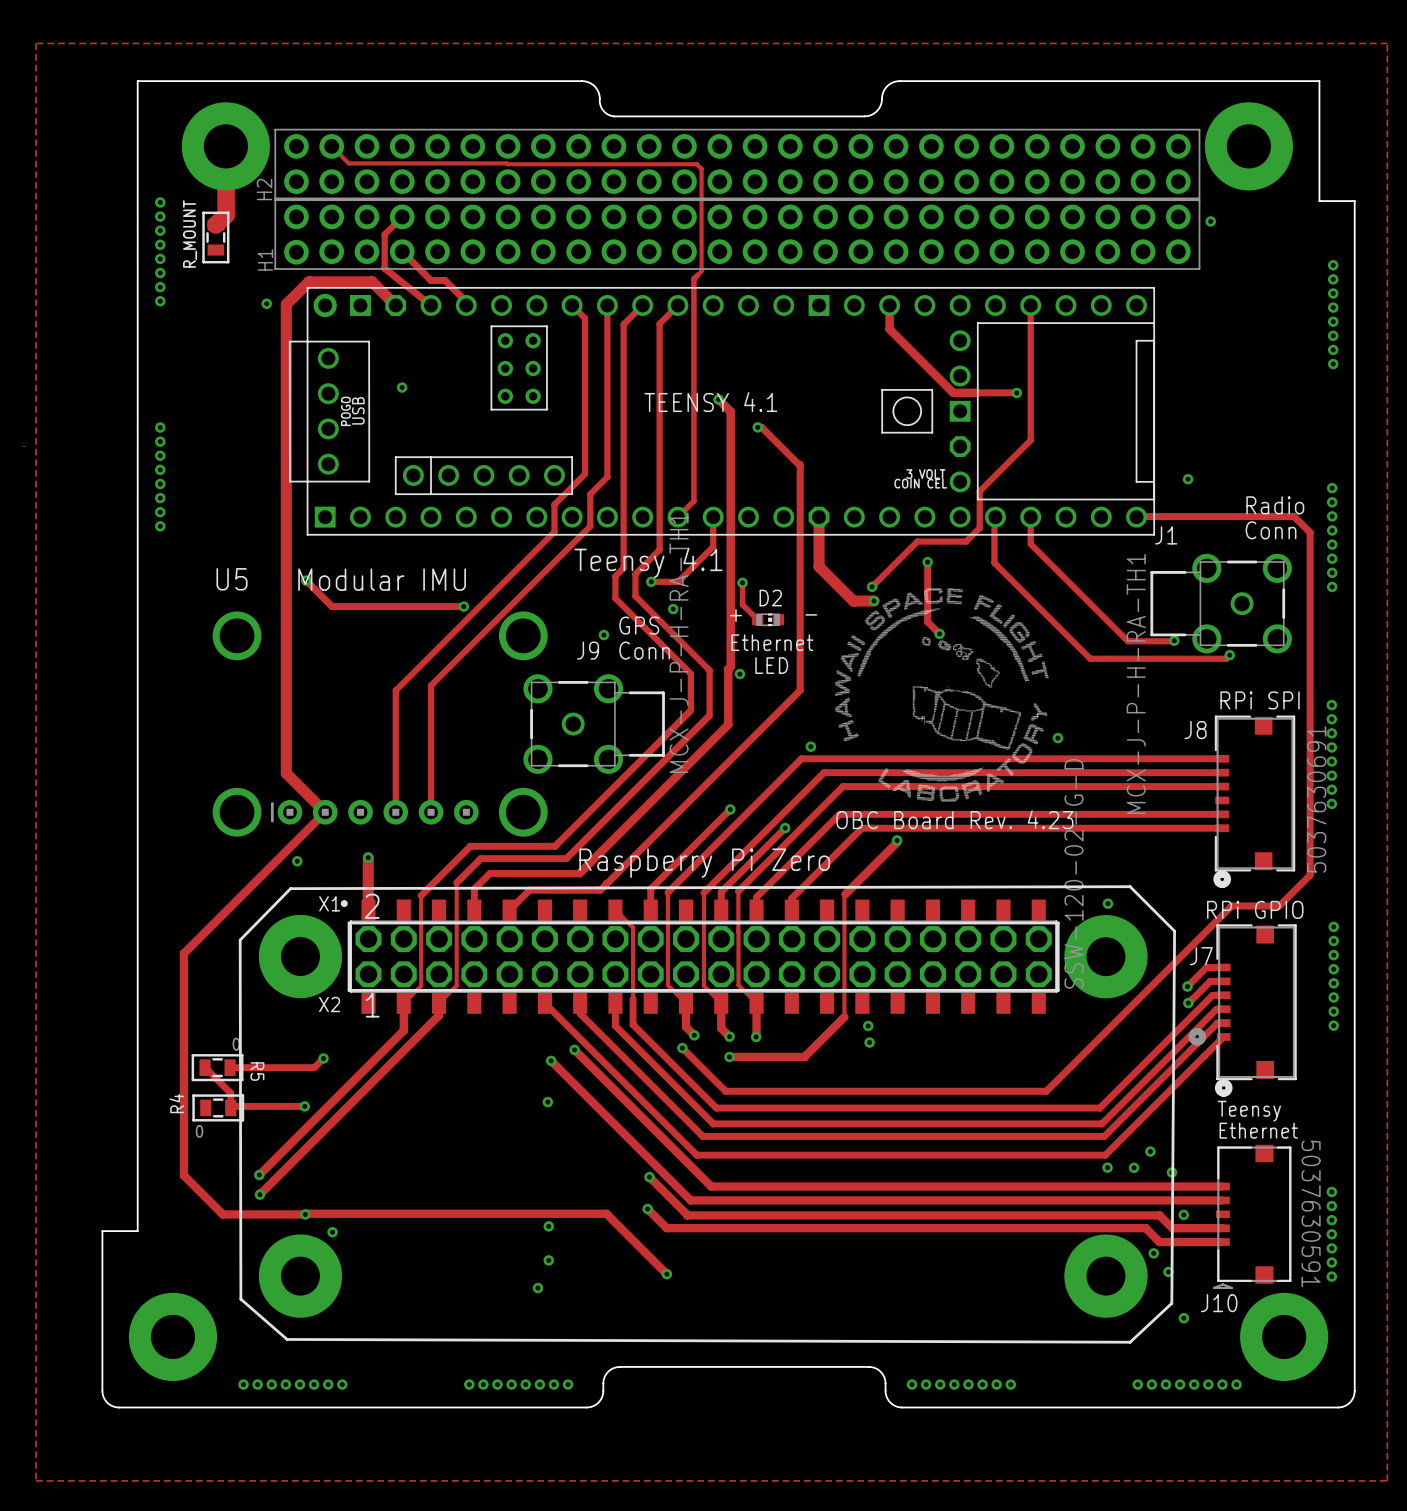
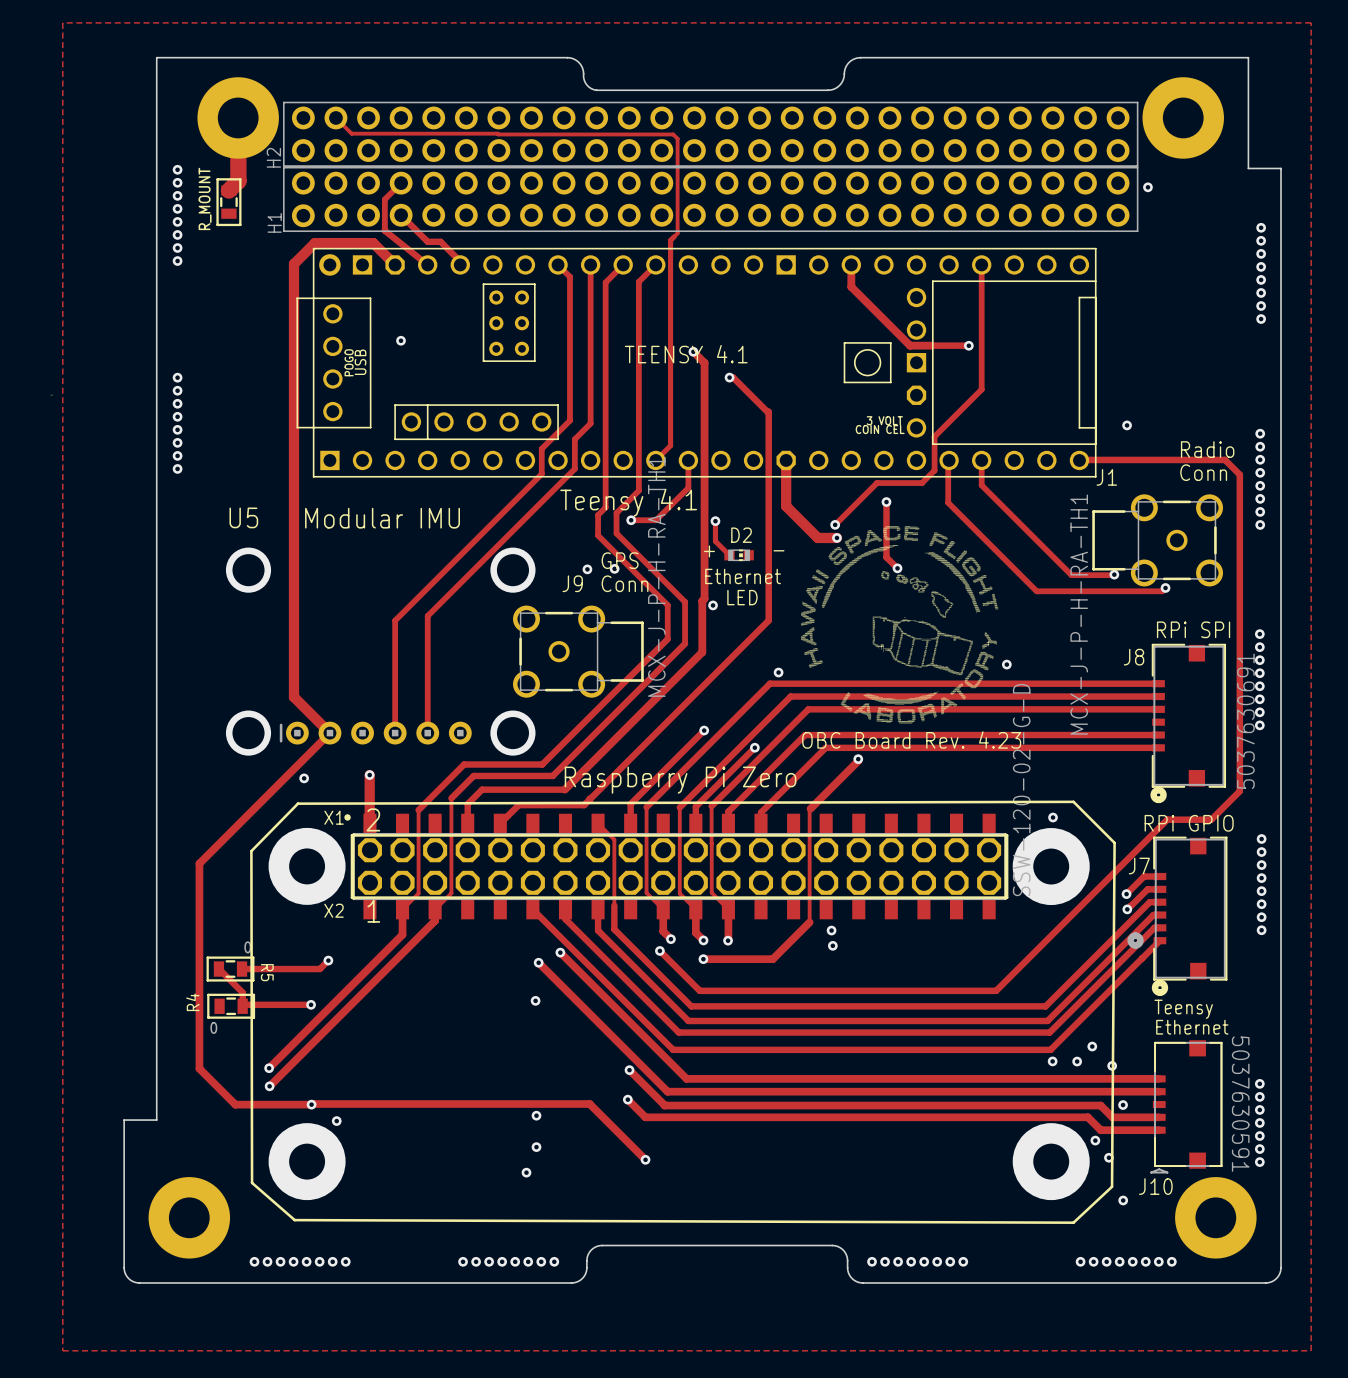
via: (266, 303) -> none
track: (306, 580) (332, 606) (463, 606) -> none
via: (306, 580) -> none
via: (463, 606) -> none
via position: (673, 609) -> (614, 568)

